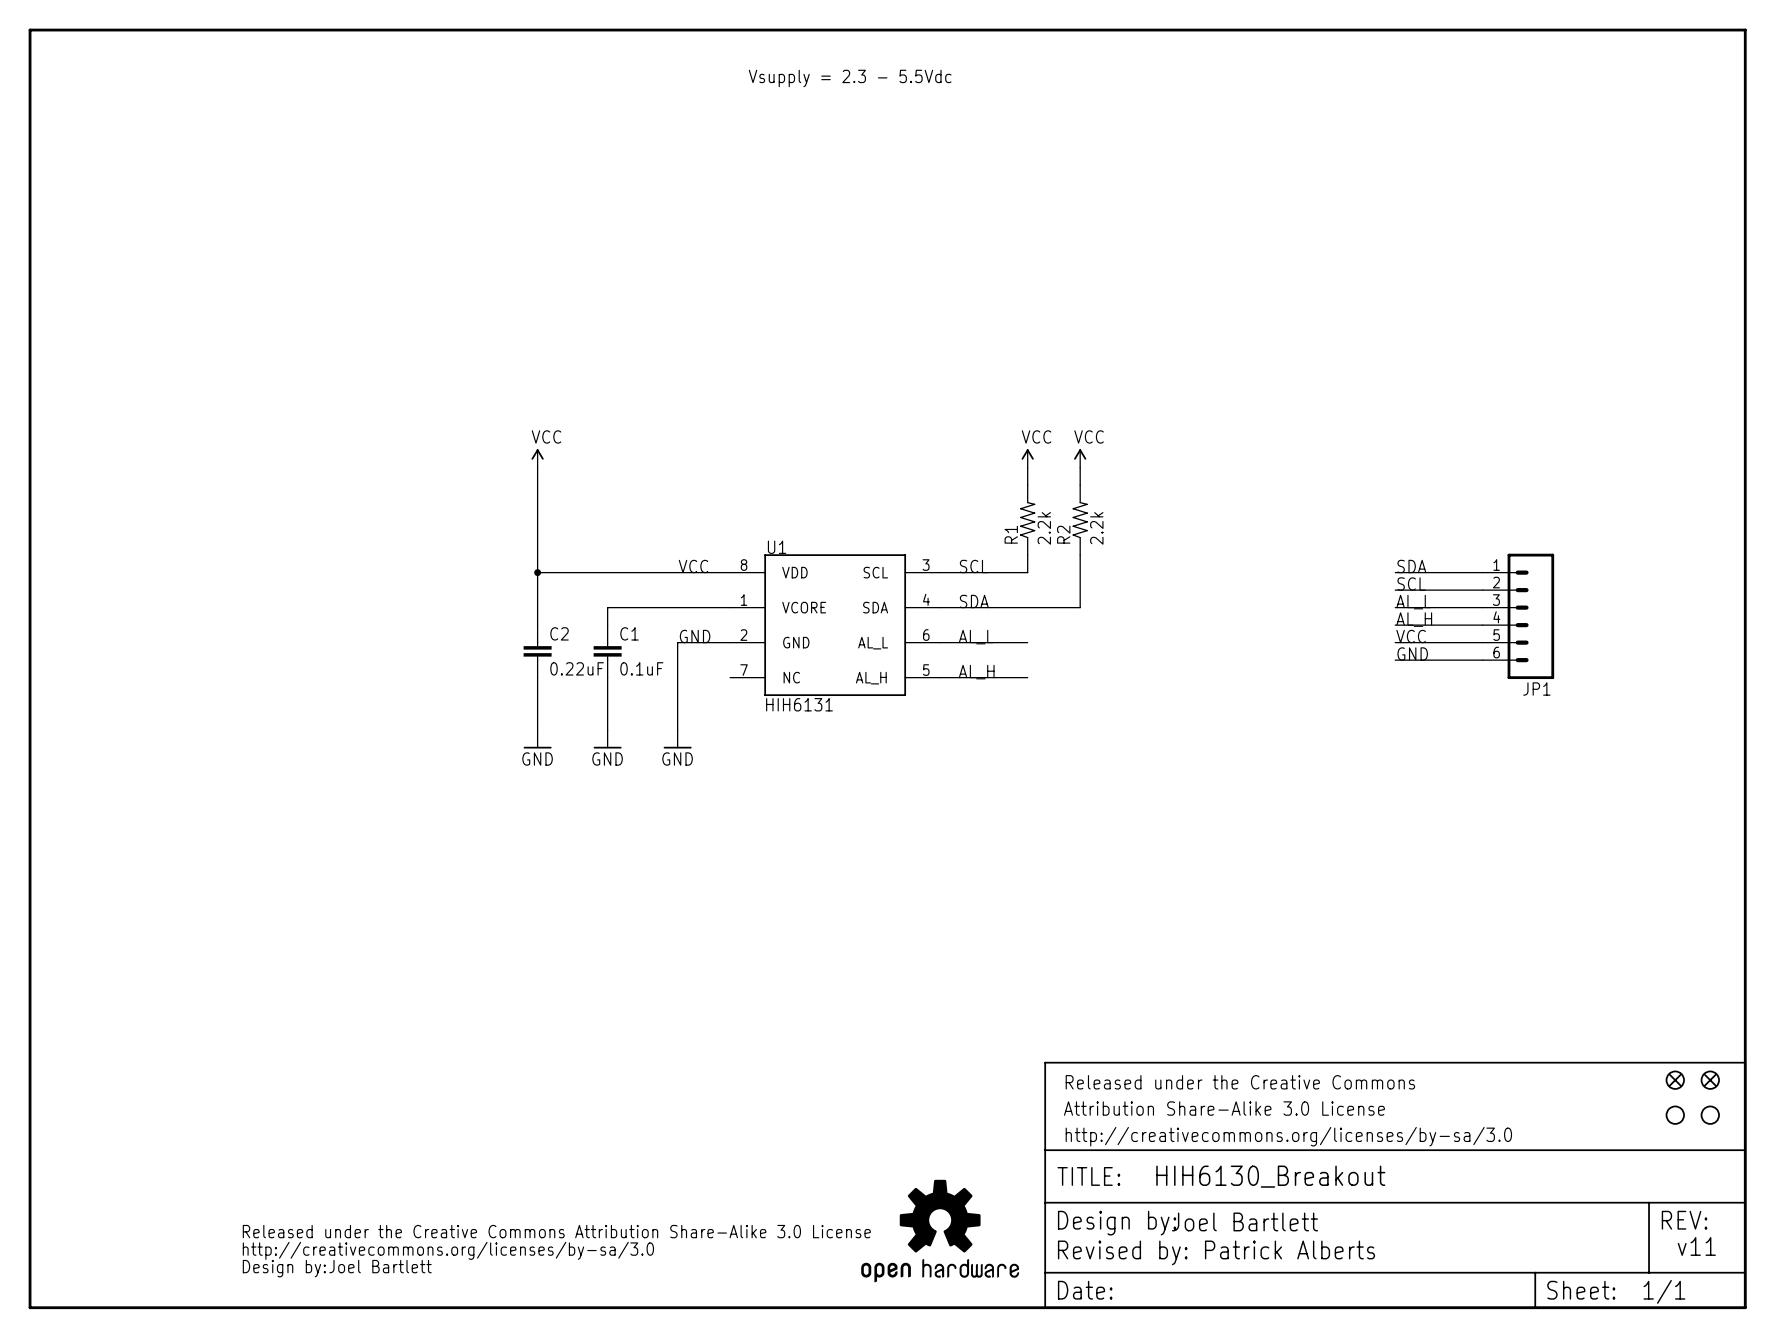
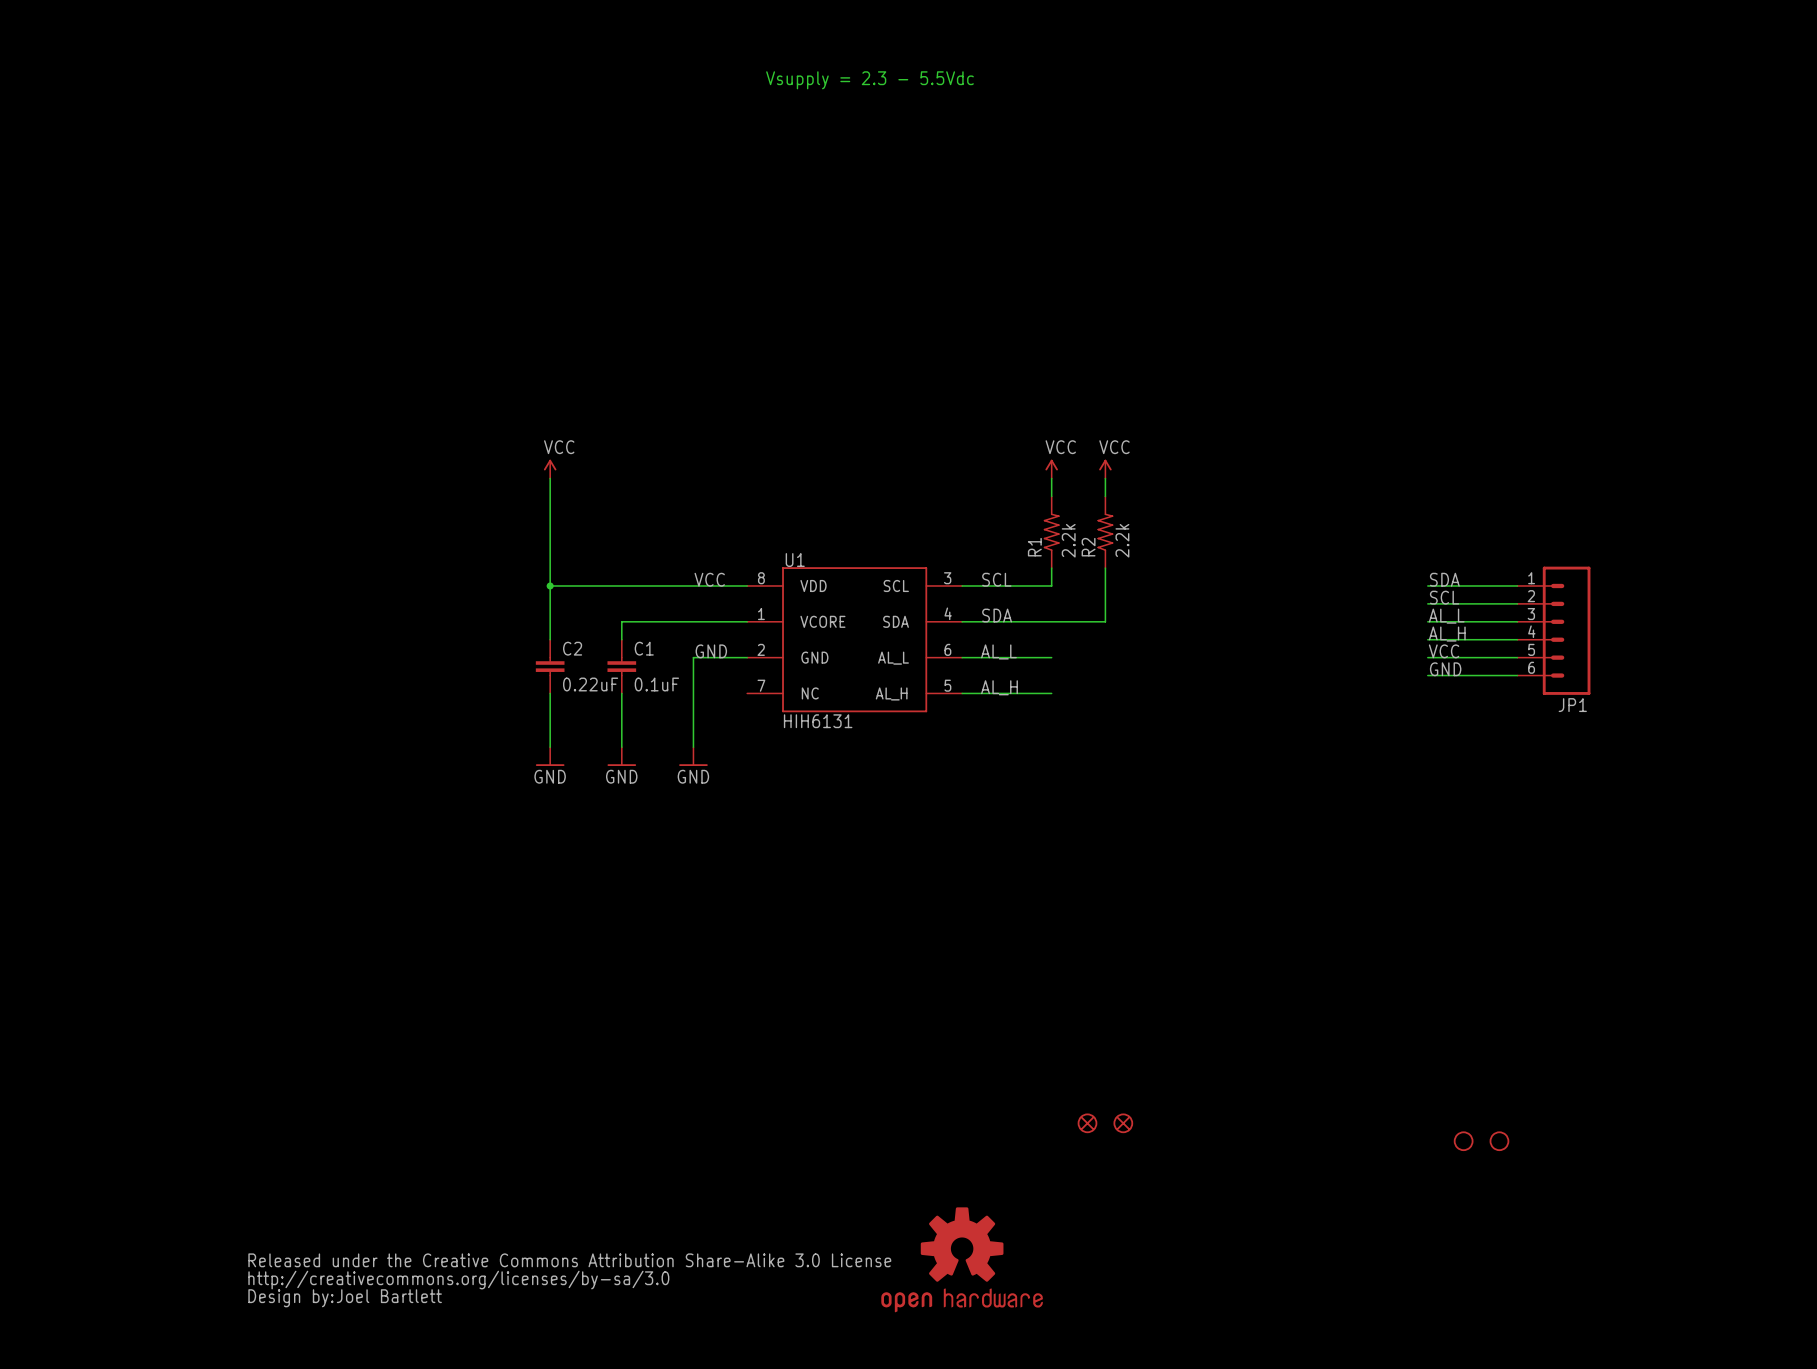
part: (887, 668) -> none
part: (1675, 1080) -> none
part: (1710, 1080) -> none
part: none -> (1087, 1123)
part: none -> (1123, 1123)
part: none -> (1463, 1141)
part: none -> (1499, 1141)
part: (1675, 1115) -> none
part: (1710, 1115) -> none
part: (1395, 1185) -> none
text: Joel Bartlett (1245, 1221) -> none
text: v11 (1696, 1246) -> none
text: Revised by: Patrick Alberts (1216, 1252) -> none

